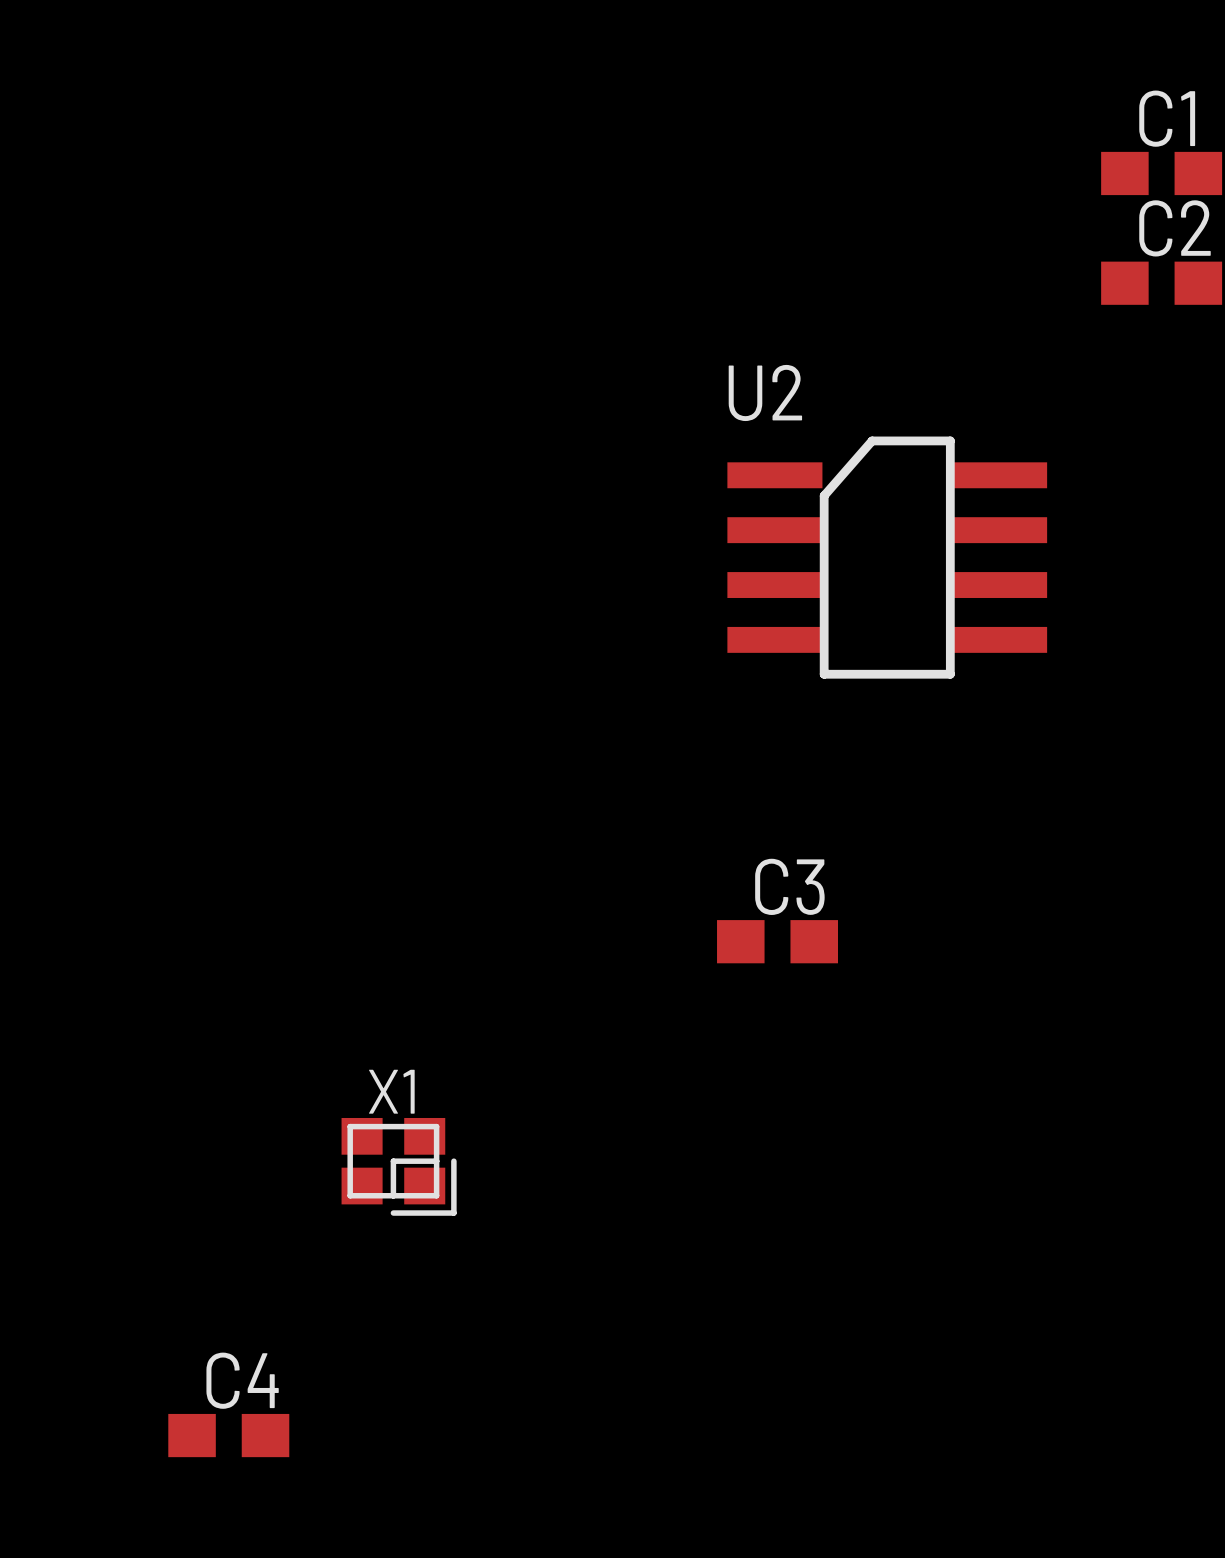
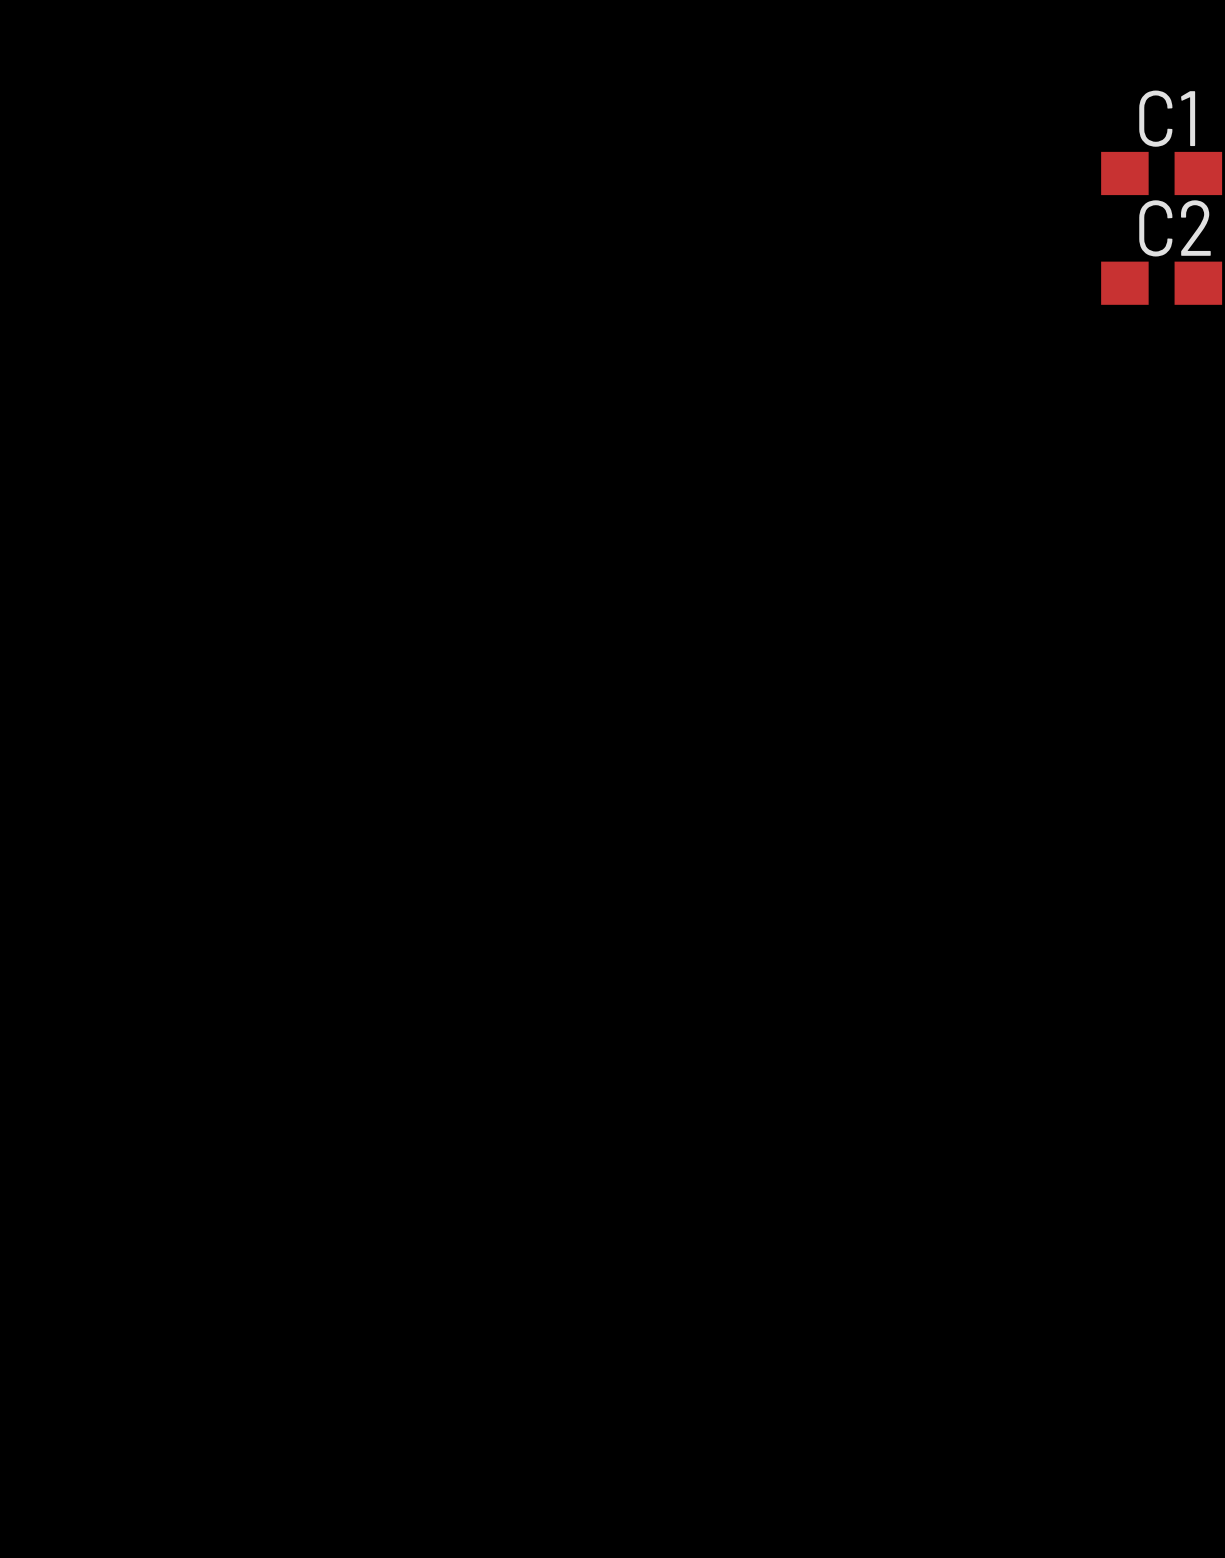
U2: (887, 557) -> none
C3: (777, 941) -> none
X1: (399, 1166) -> none
C4: (228, 1435) -> none

